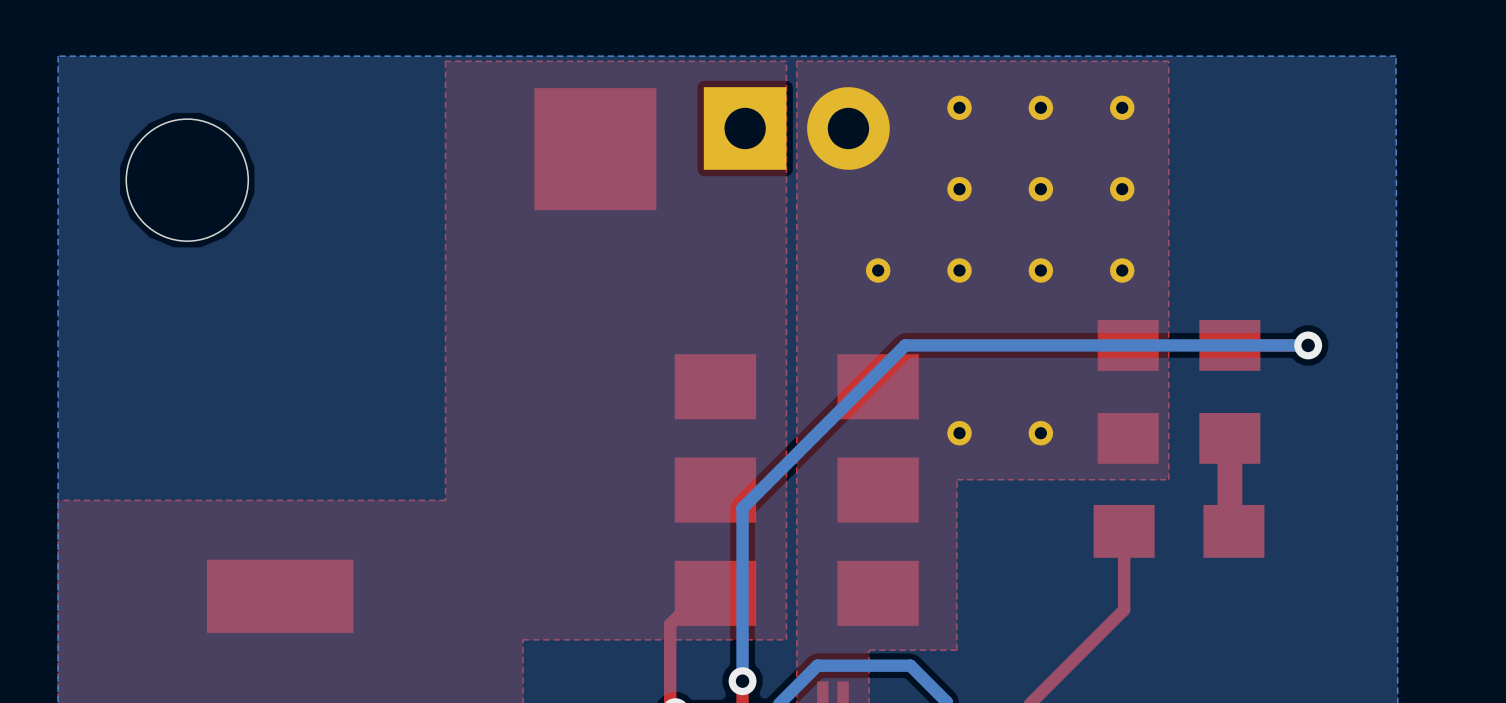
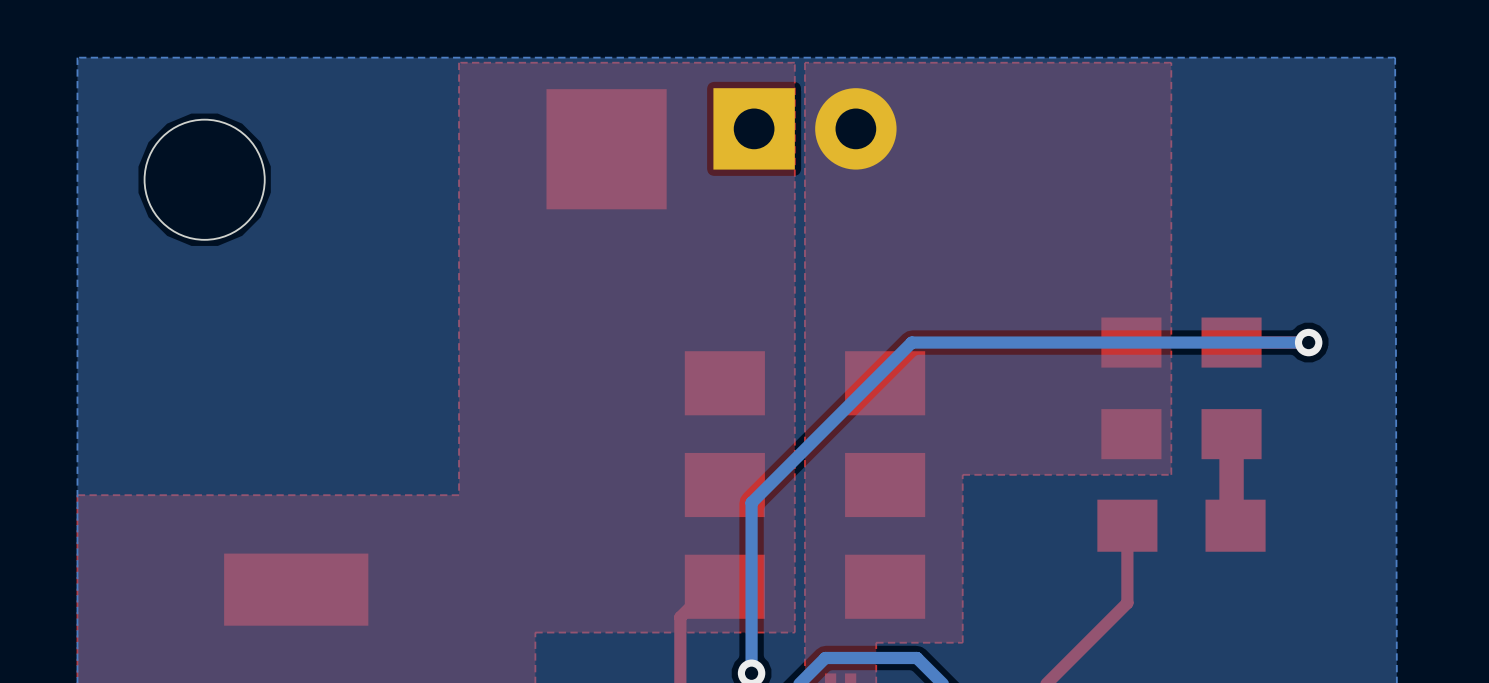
part: (959, 107) -> none
part: (1040, 107) -> none
part: (1122, 107) -> none
part: (959, 189) -> none
part: (1040, 189) -> none
part: (1122, 189) -> none
part: (878, 270) -> none
part: (959, 270) -> none
part: (1040, 270) -> none
part: (1122, 270) -> none
part: (959, 433) -> none
part: (1040, 433) -> none

